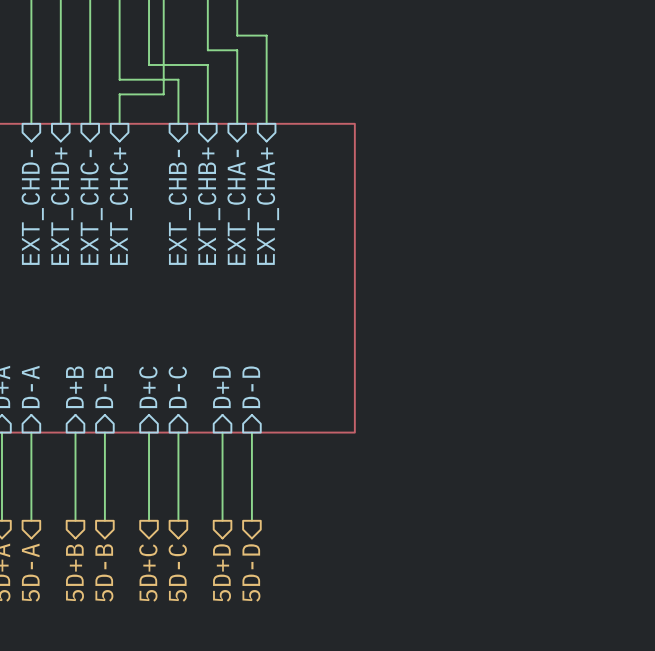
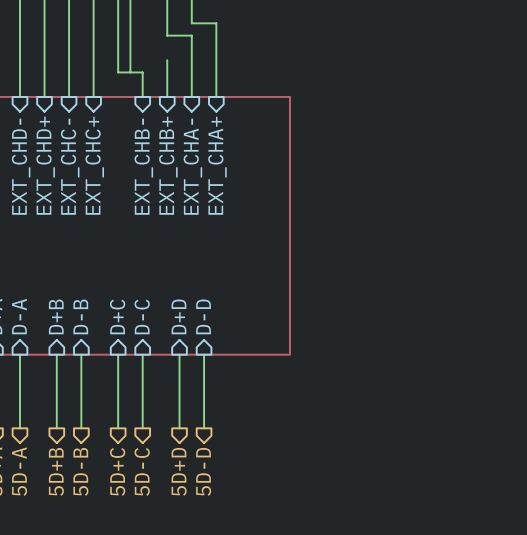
wire: (149, 64) (207, 64) (207, 79) -> (118, 47) (118, 72)
wire: (119, 79) (178, 79) (178, 94) -> (130, 72) (142, 72)
wire: (119, 94) (149, 94) -> (93, 72) (93, 60)

